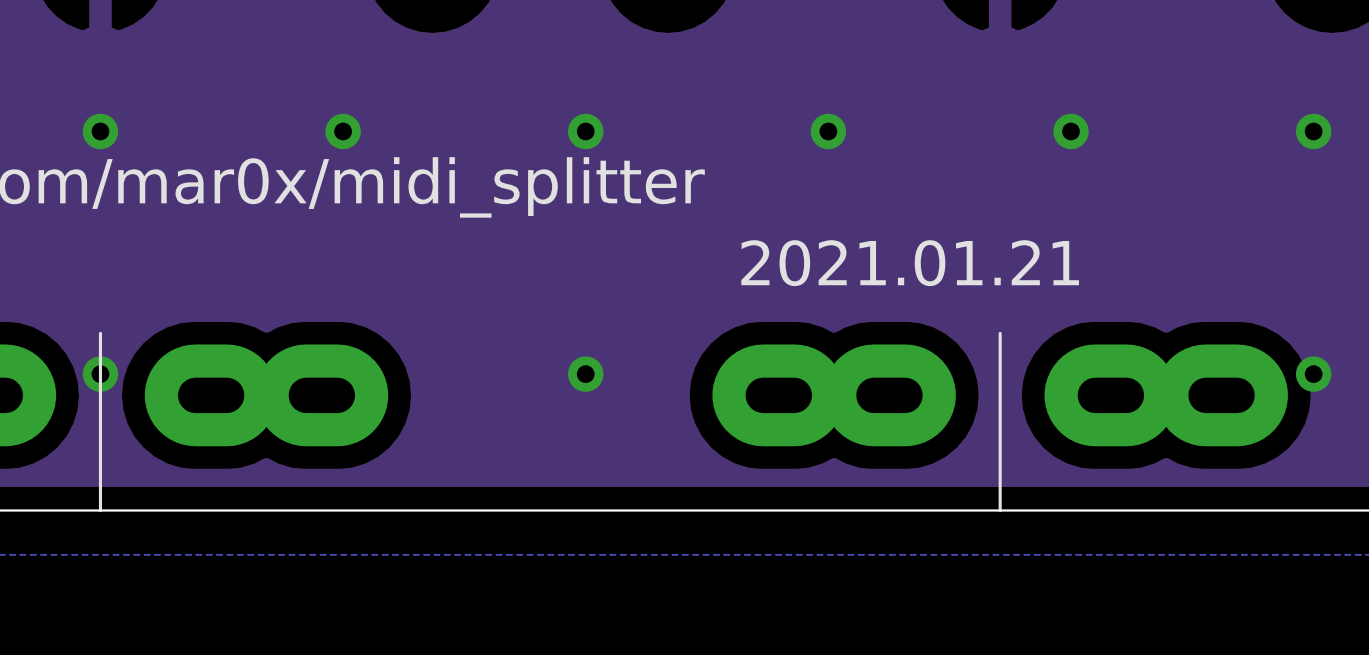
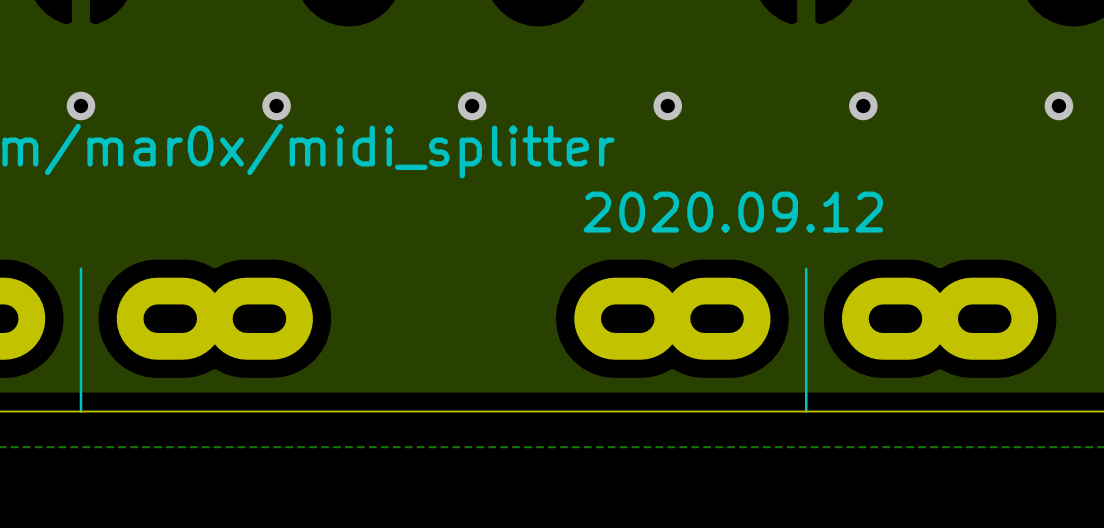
text: 2021.01.21 (910, 263) -> 2020.09.12 (733, 212)
via: (100, 374) -> none
via: (585, 374) -> none
via: (1313, 374) -> none

